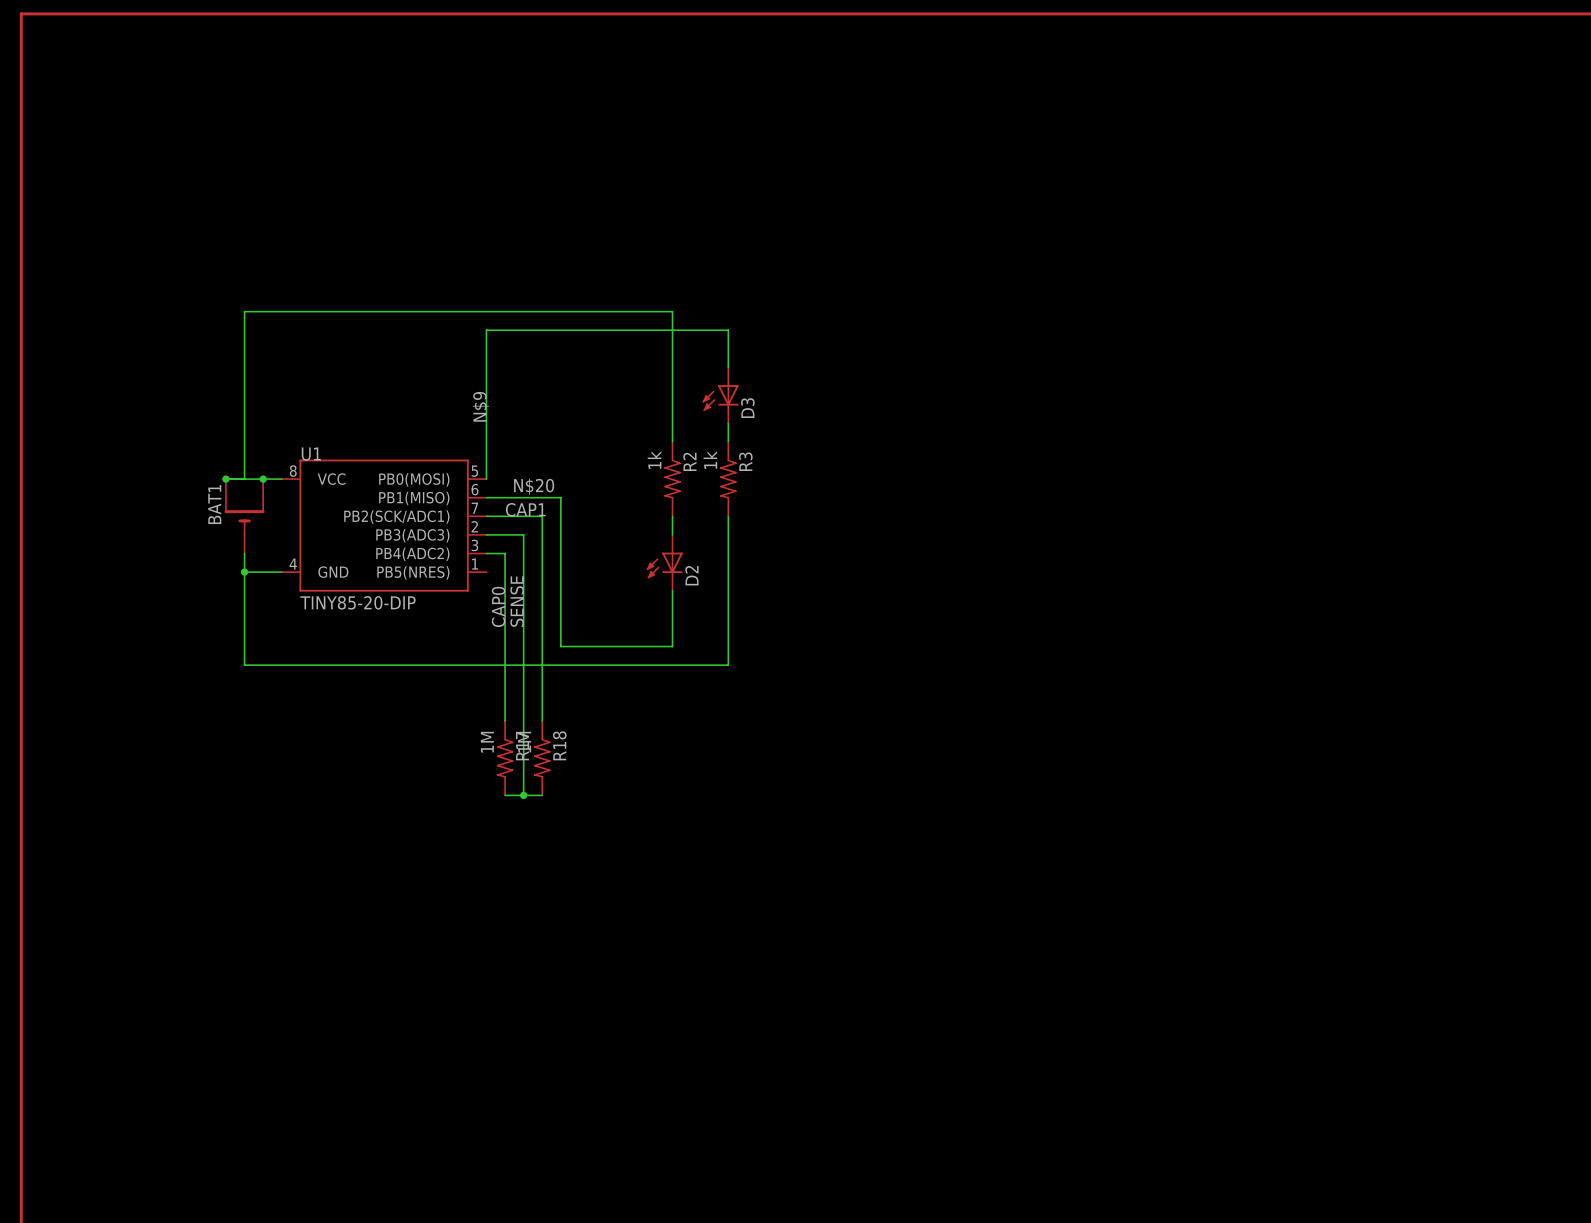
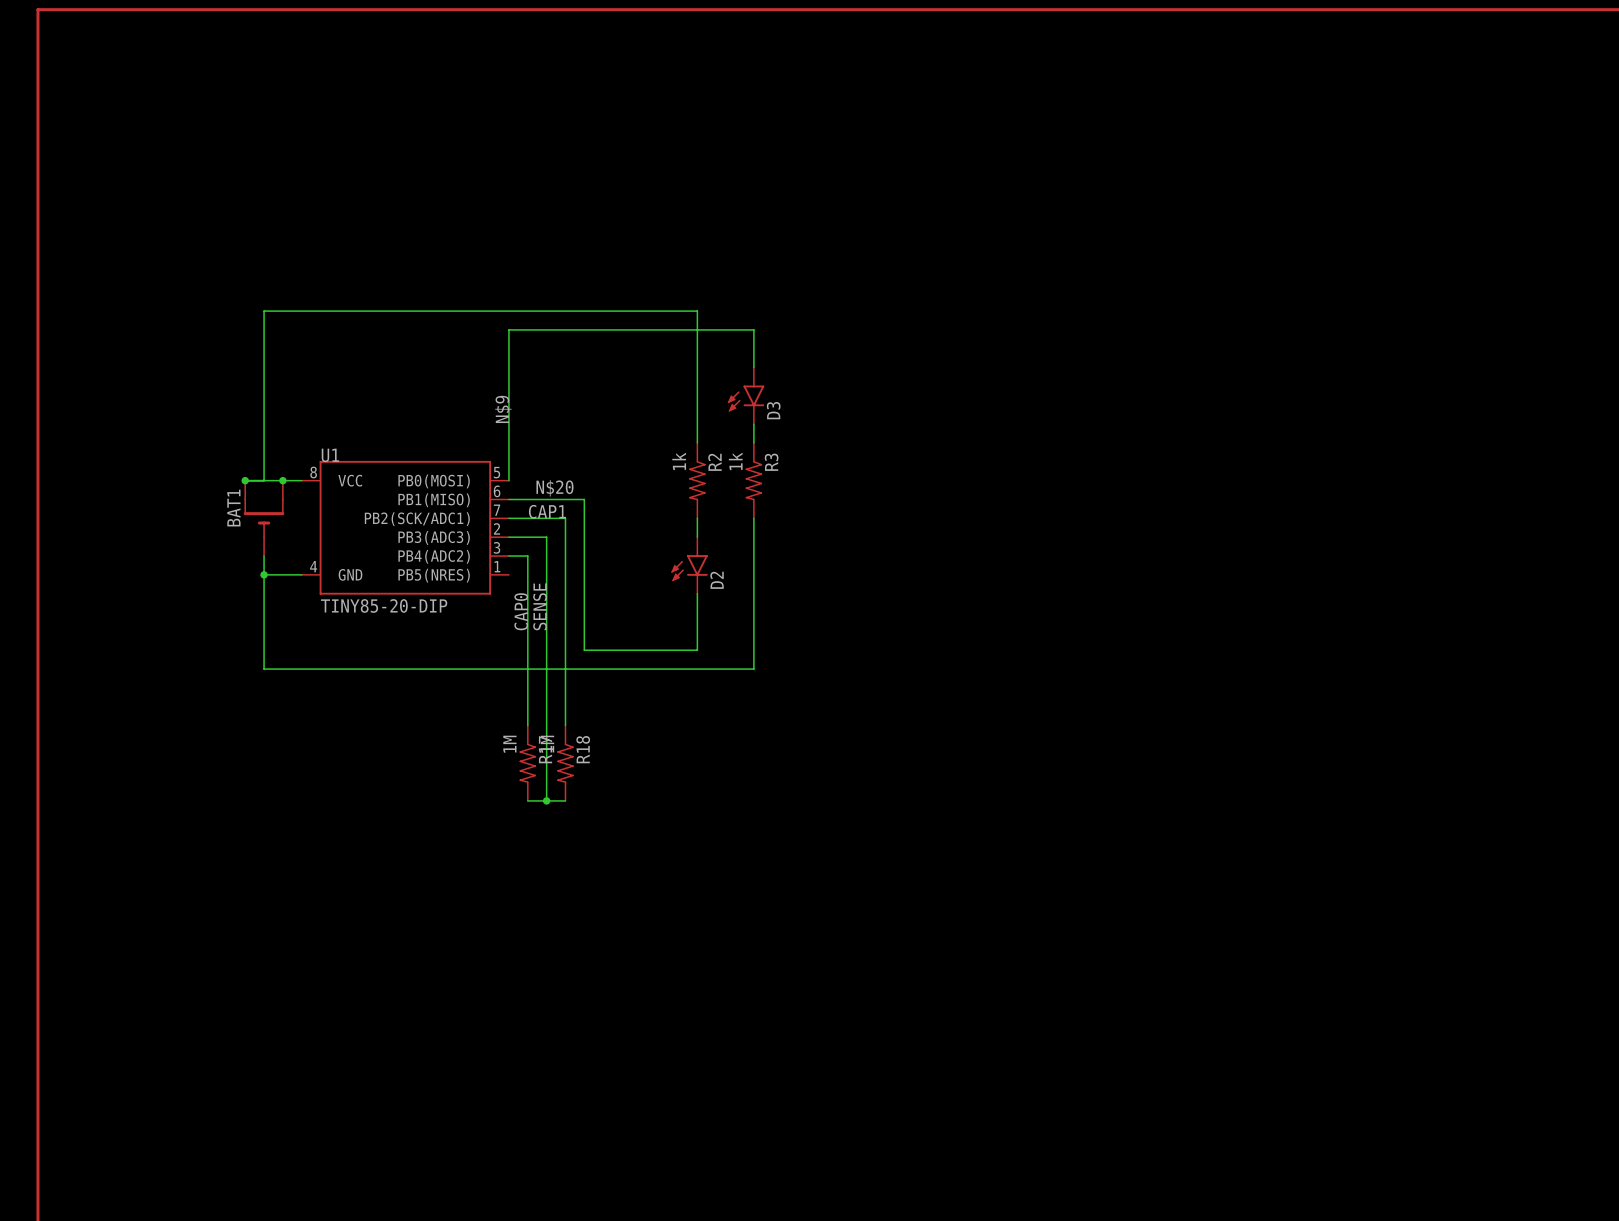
D3 symbol: [702, 367, 739, 424] -> [727, 367, 765, 425]
D2 symbol: [646, 534, 683, 591] -> [671, 537, 708, 594]

